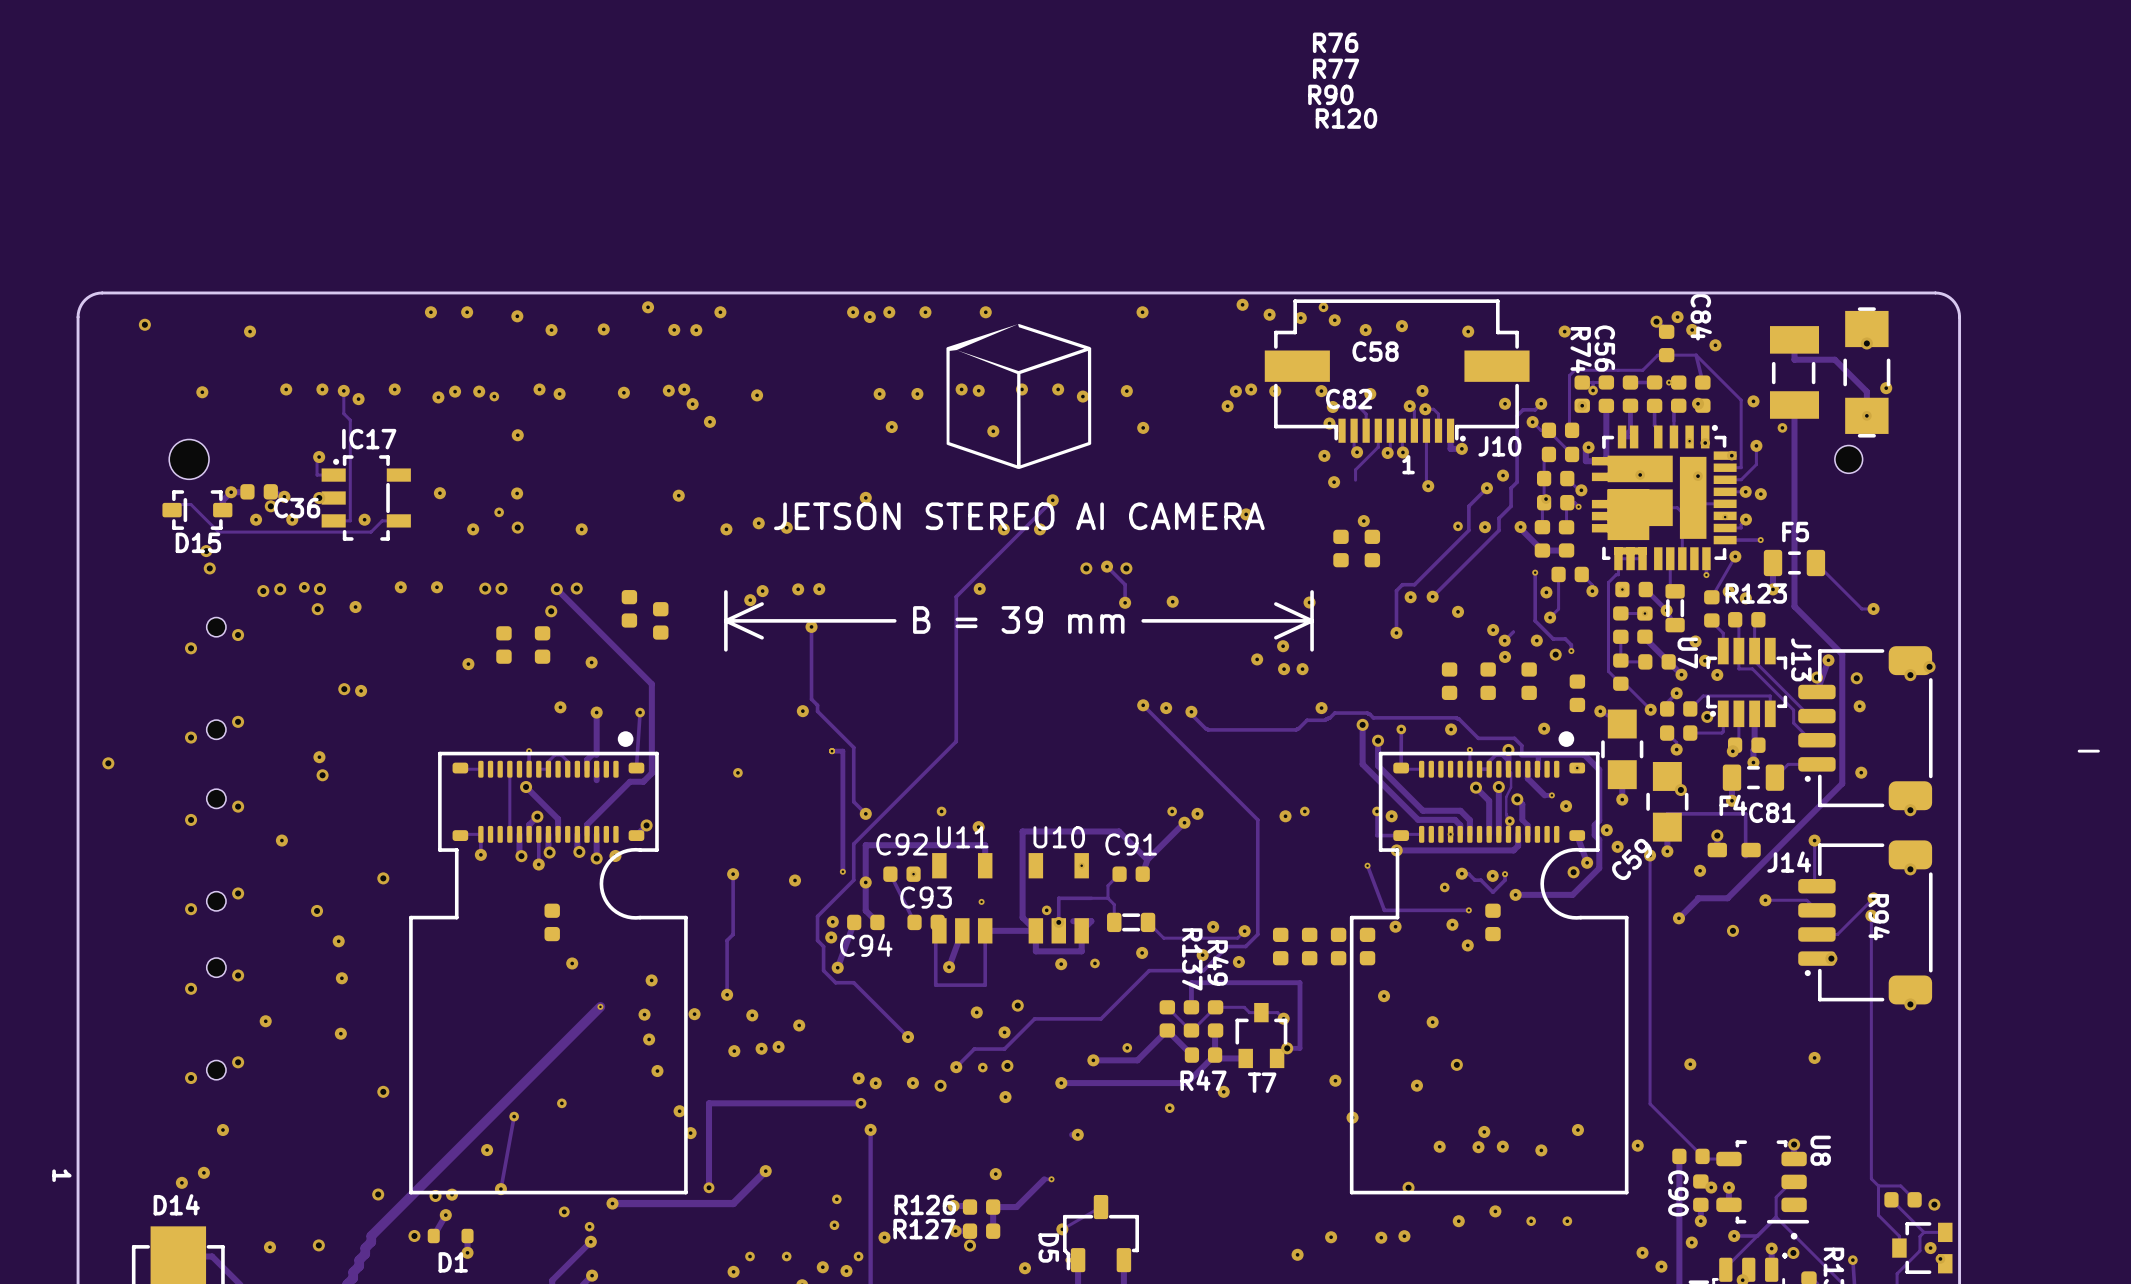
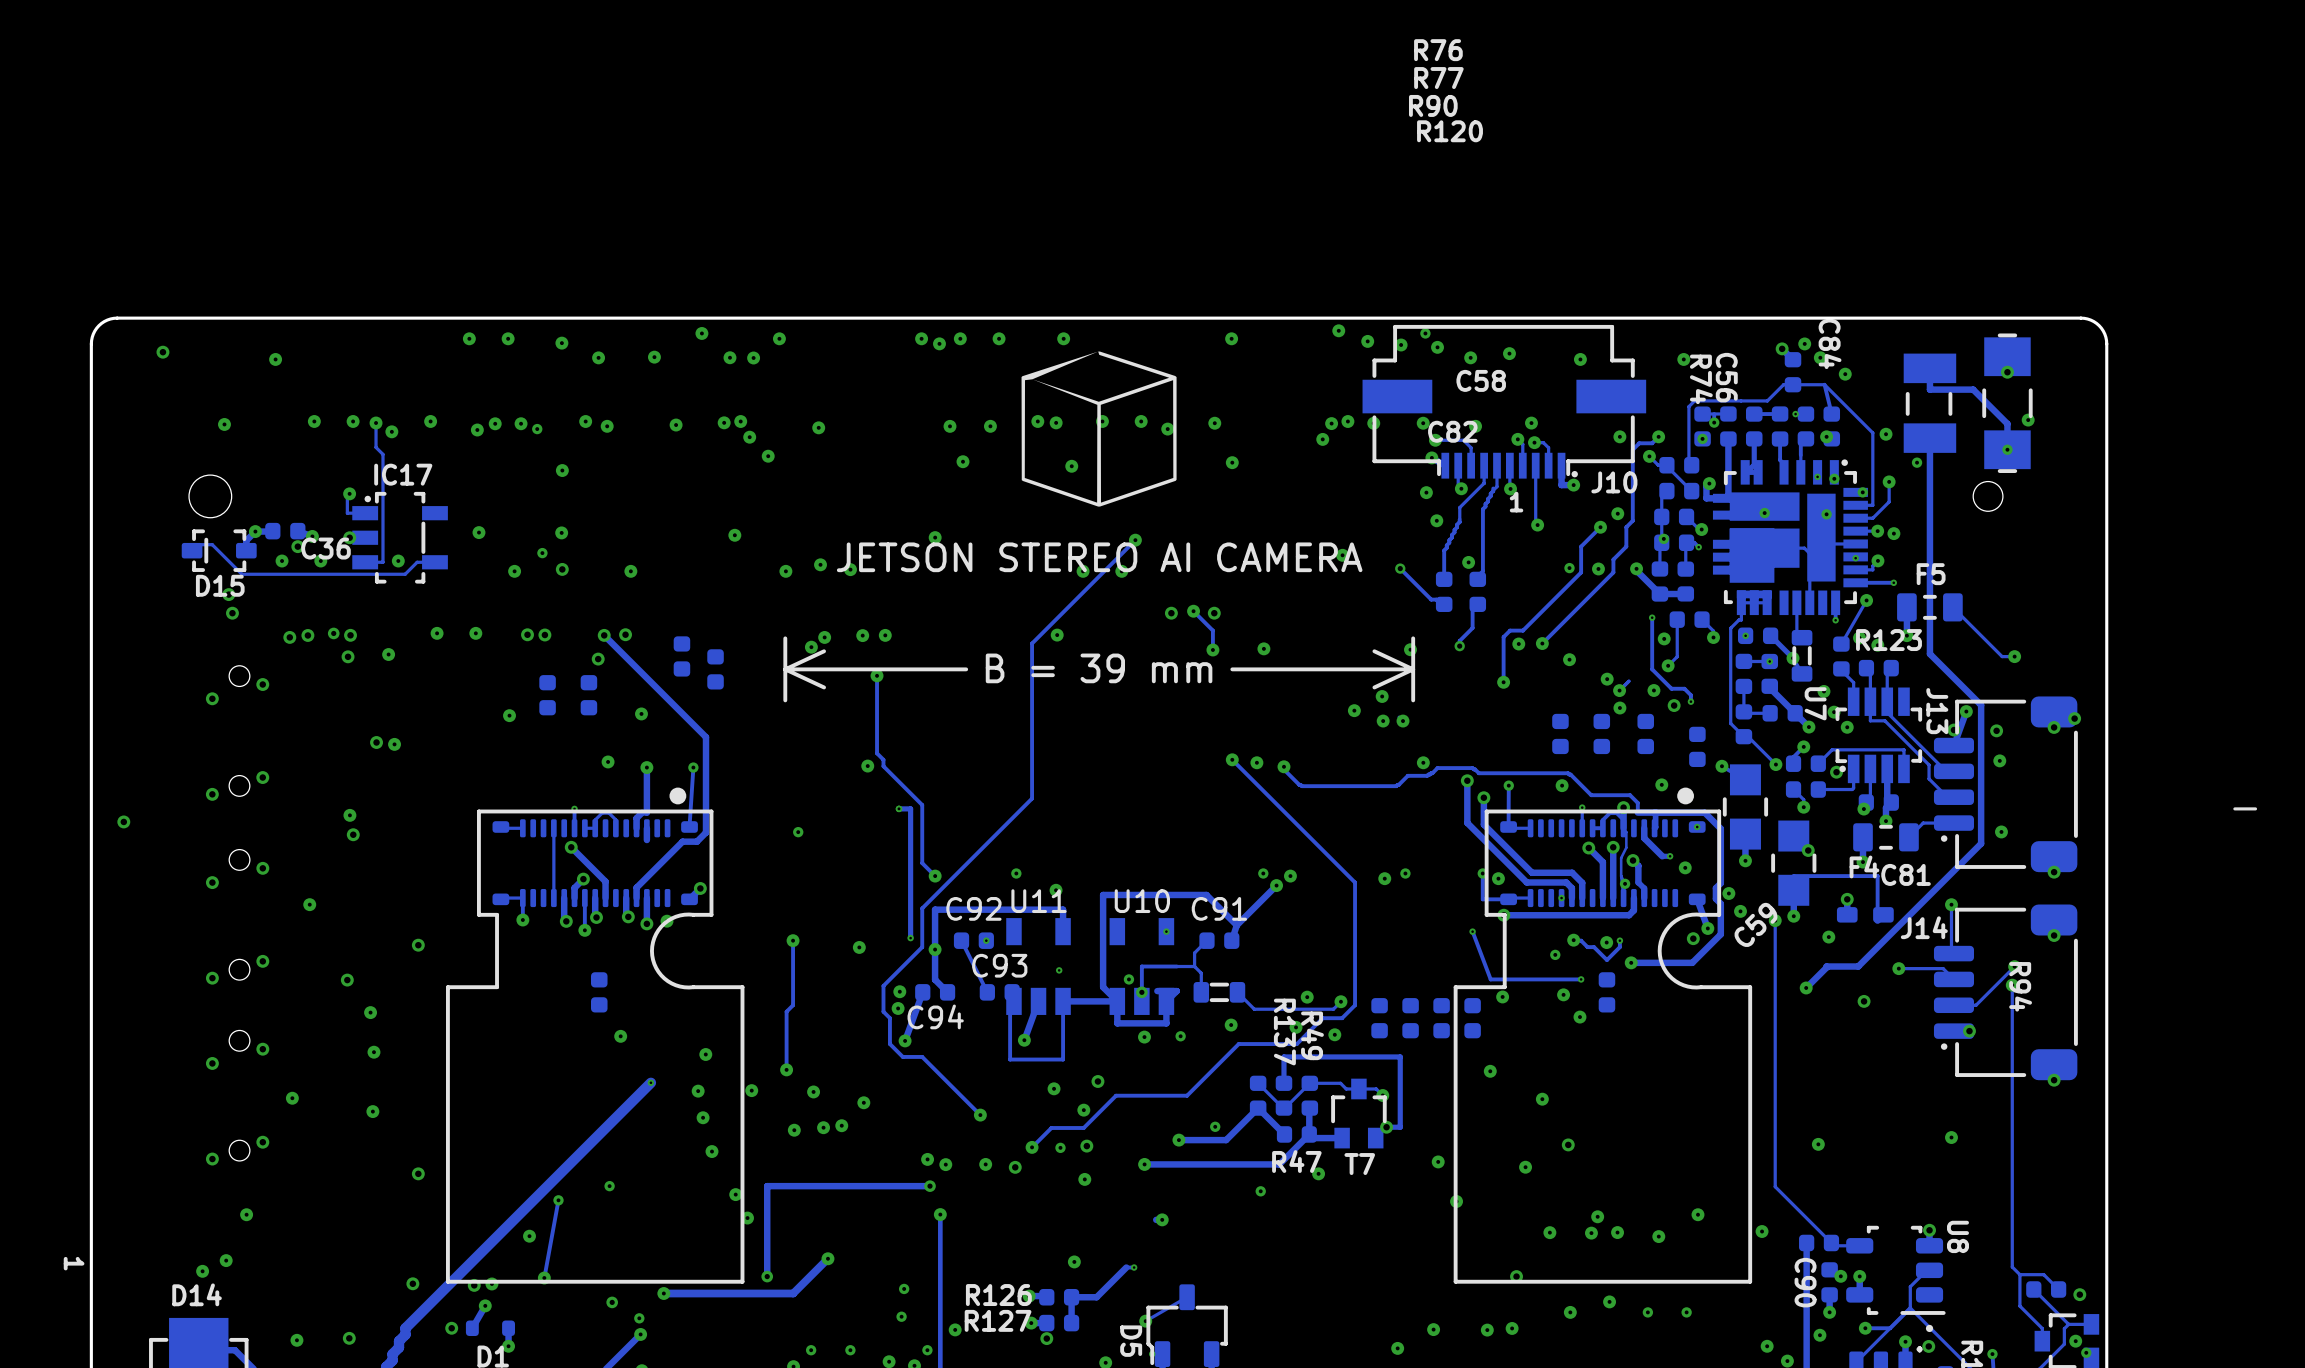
track: none -> (1493, 488) (1482, 509) (1482, 571) (1477, 578)
via: (1387, 452) -> none
track: none -> (1459, 519) (1444, 550) (1444, 578)
track: none -> (1400, 568) (1431, 599) (1436, 599) (1444, 604)
via: none -> (1400, 568)
track: none -> (1477, 604) (1472, 609) (1472, 628) (1459, 640) (1459, 646)
via: none -> (1459, 646)

